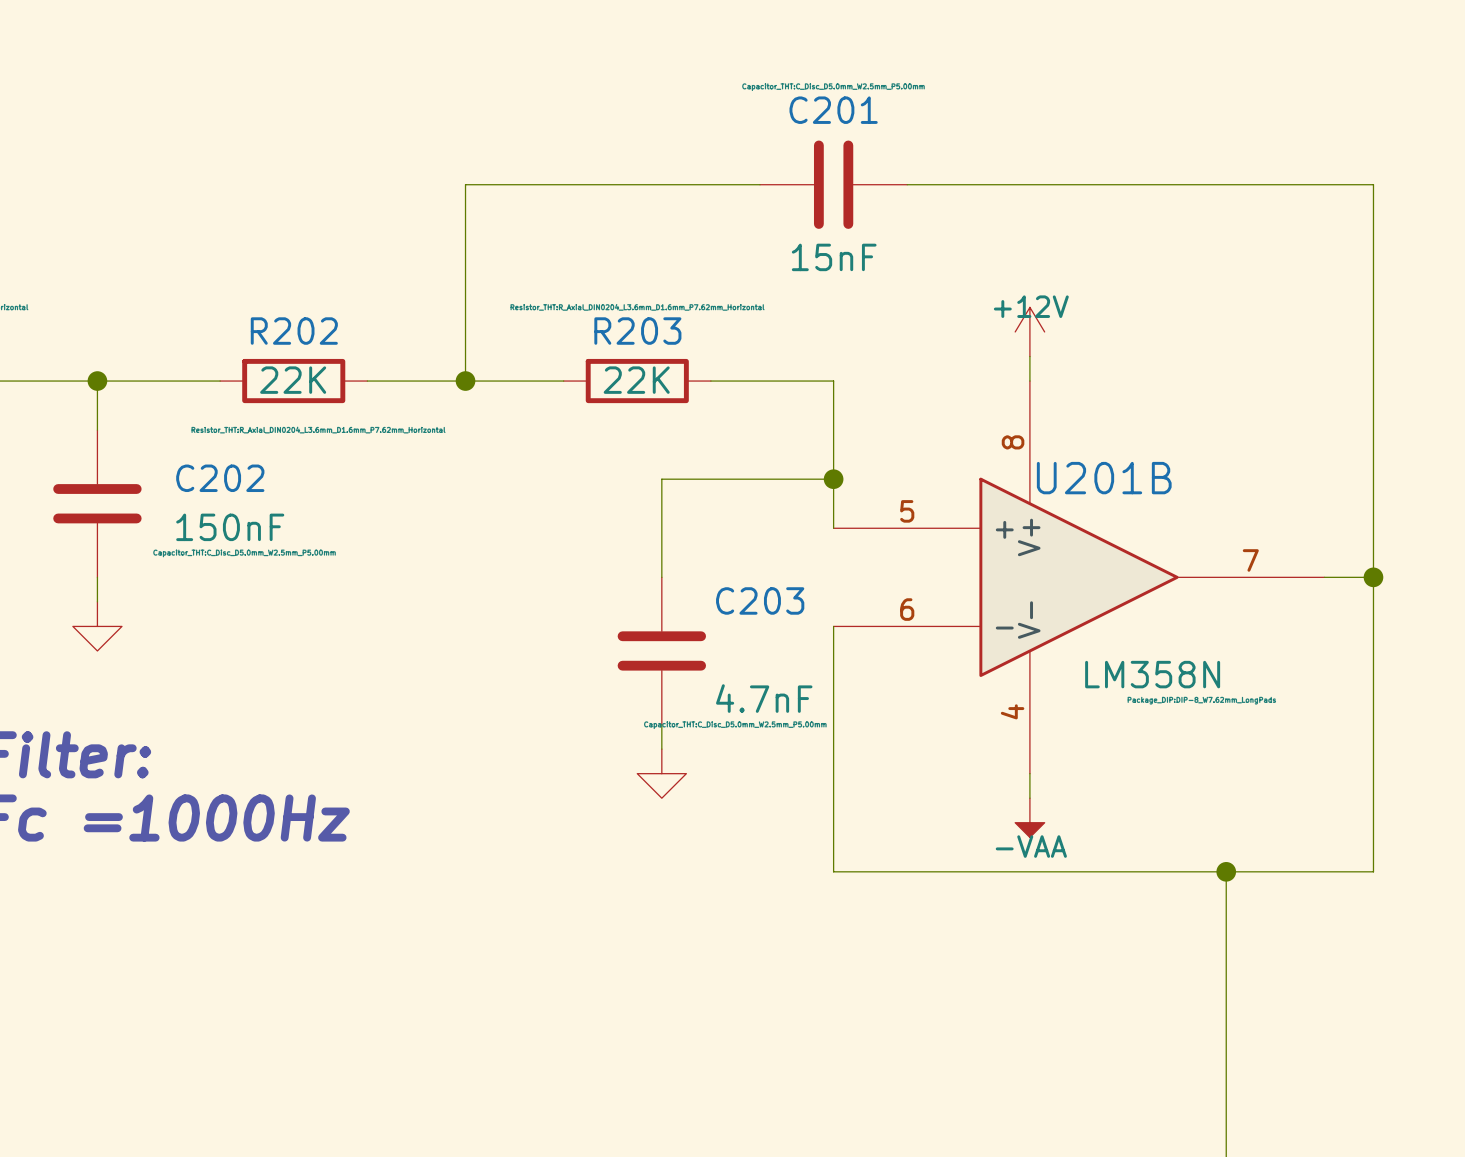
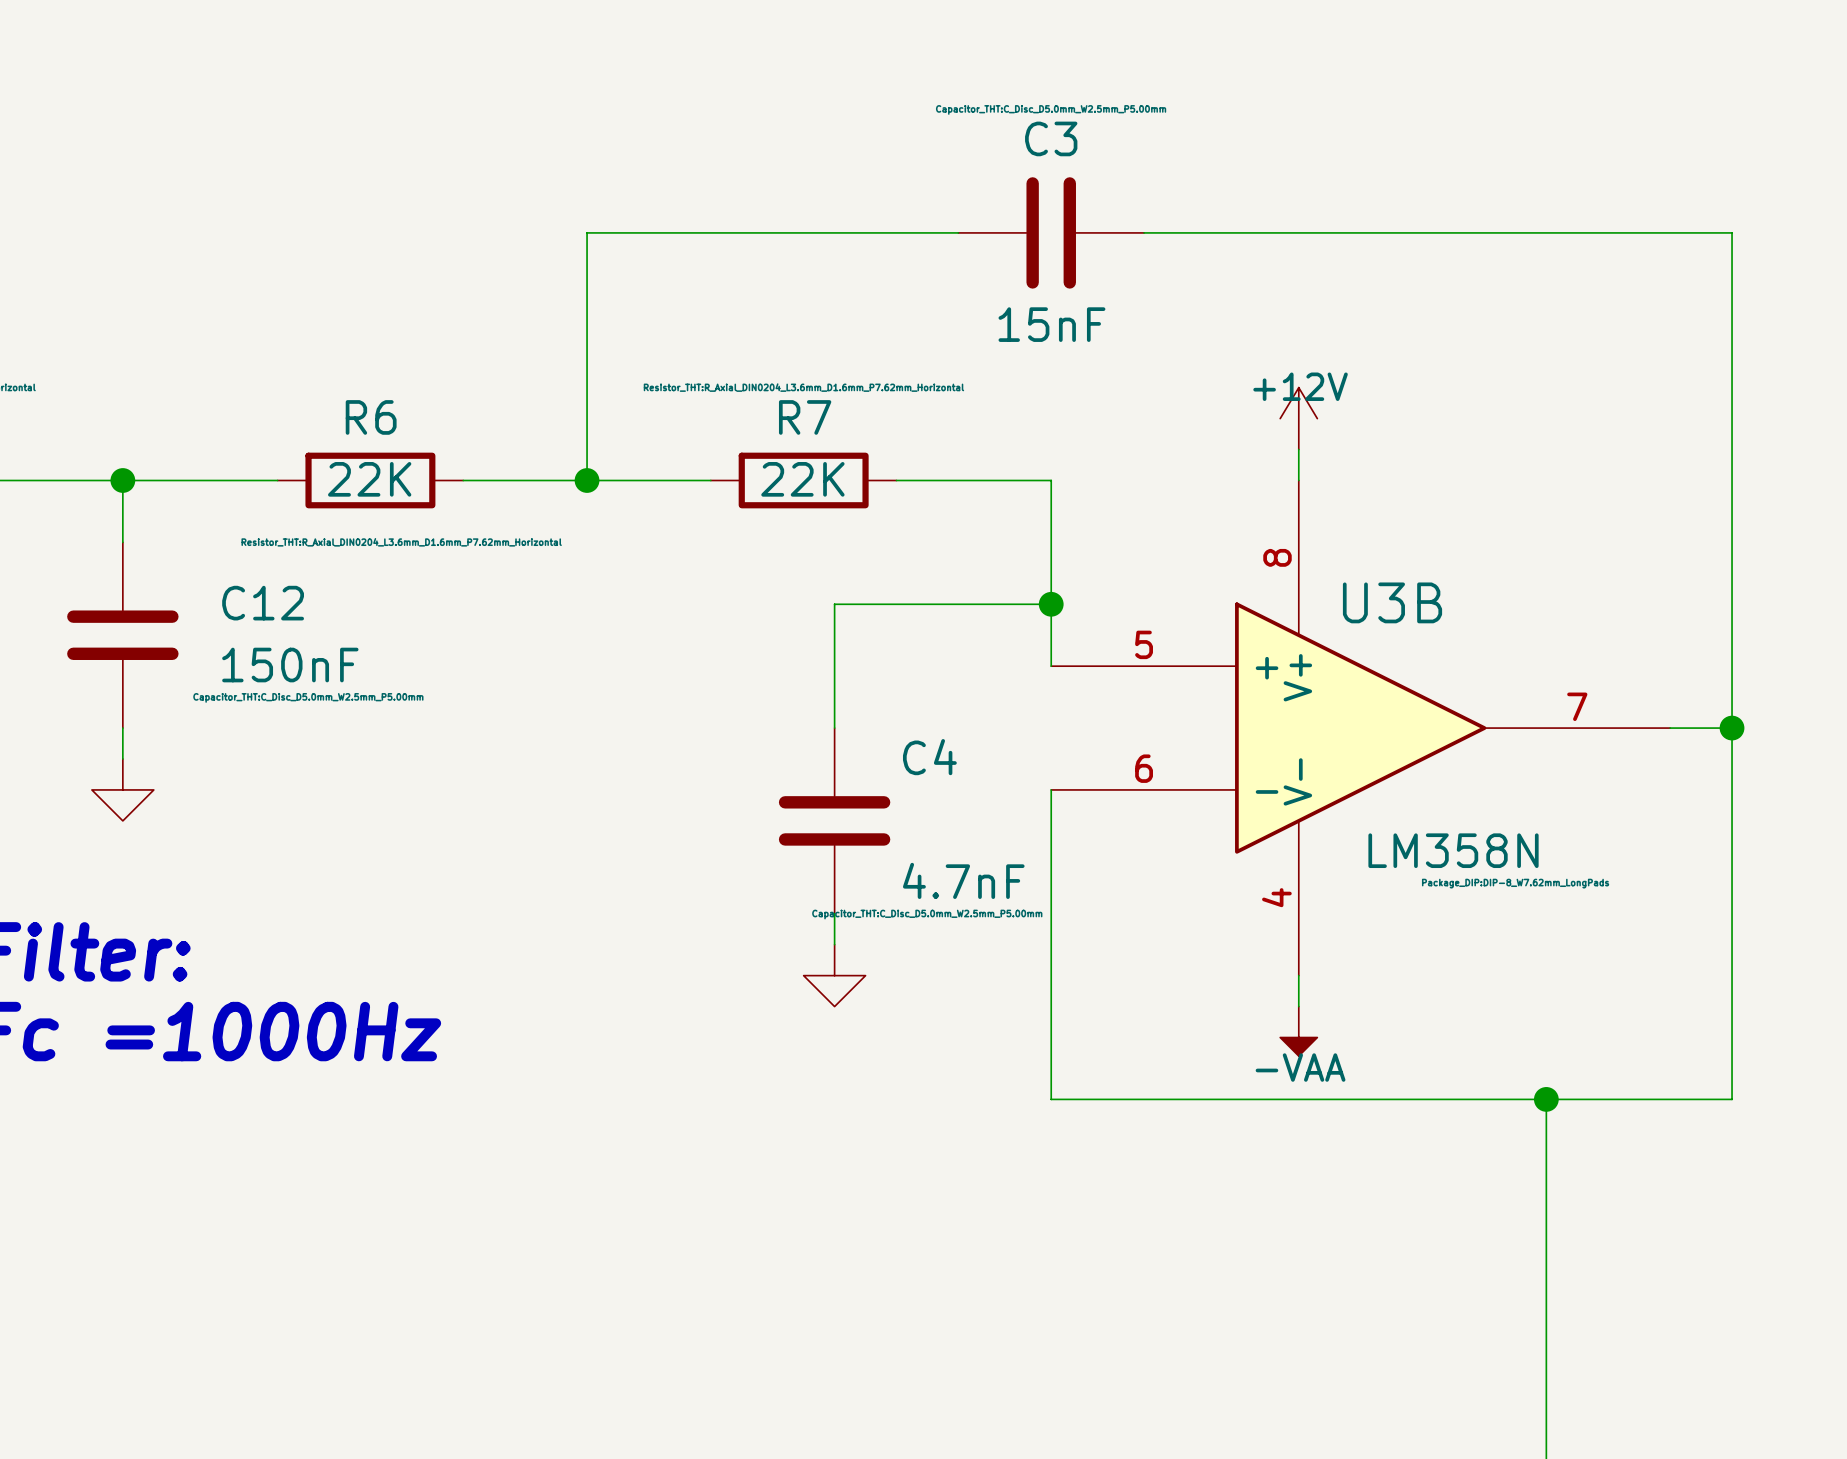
C201 name: C201 (833, 110) -> C3 (1051, 138)
R202 name: R202 (294, 331) -> R6 (371, 417)
R203 name: R203 (637, 331) -> R7 (805, 417)
C202 name: C202 (220, 478) -> C12 (263, 603)
U201B name: U201B (1104, 478) -> U3B (1392, 602)
C203 name: C203 (760, 600) -> C4 (929, 757)

